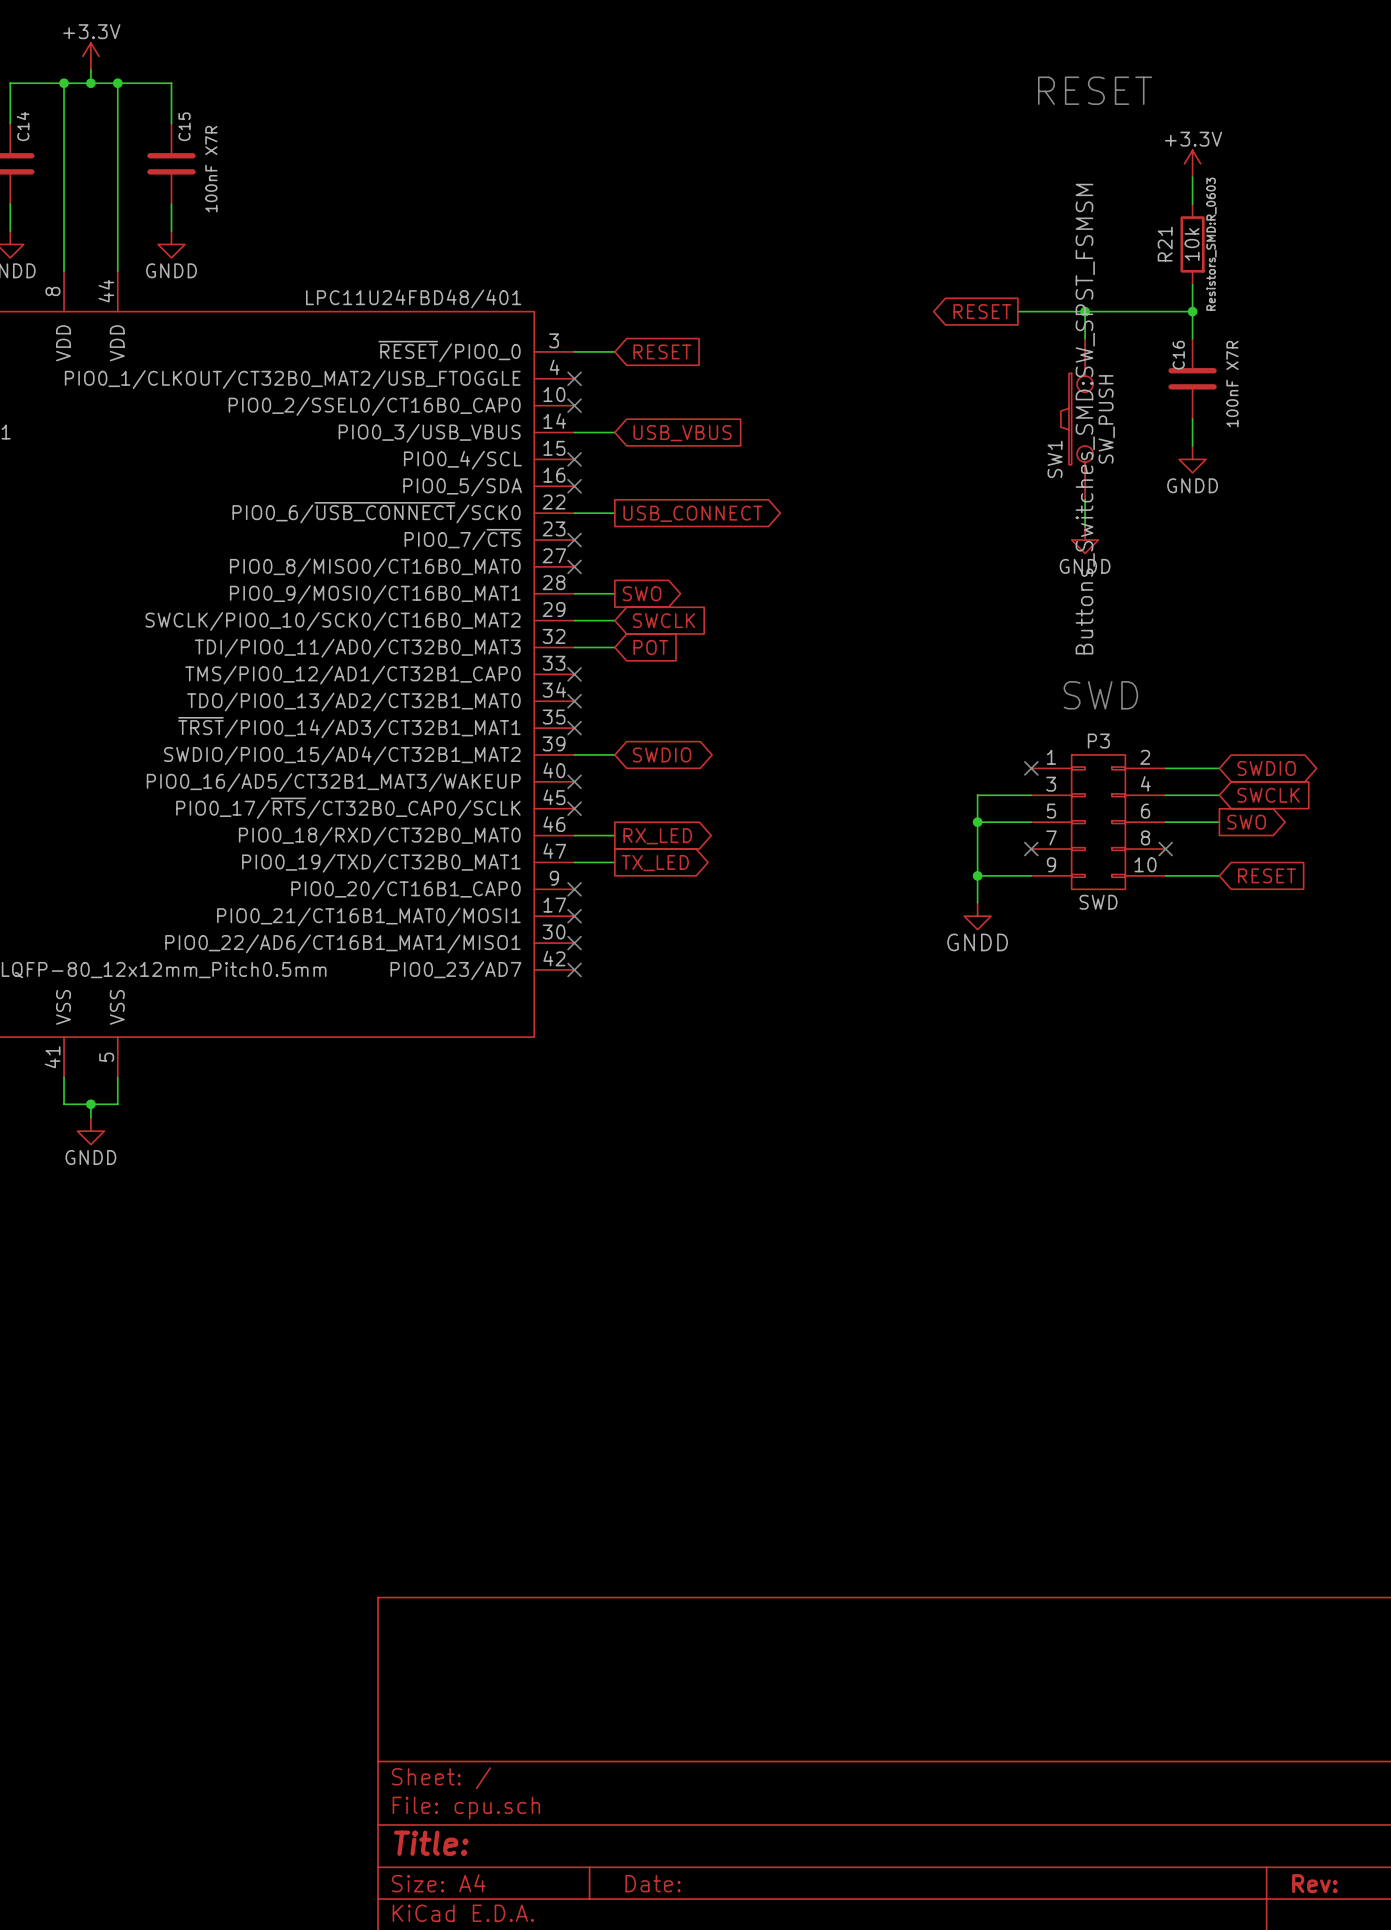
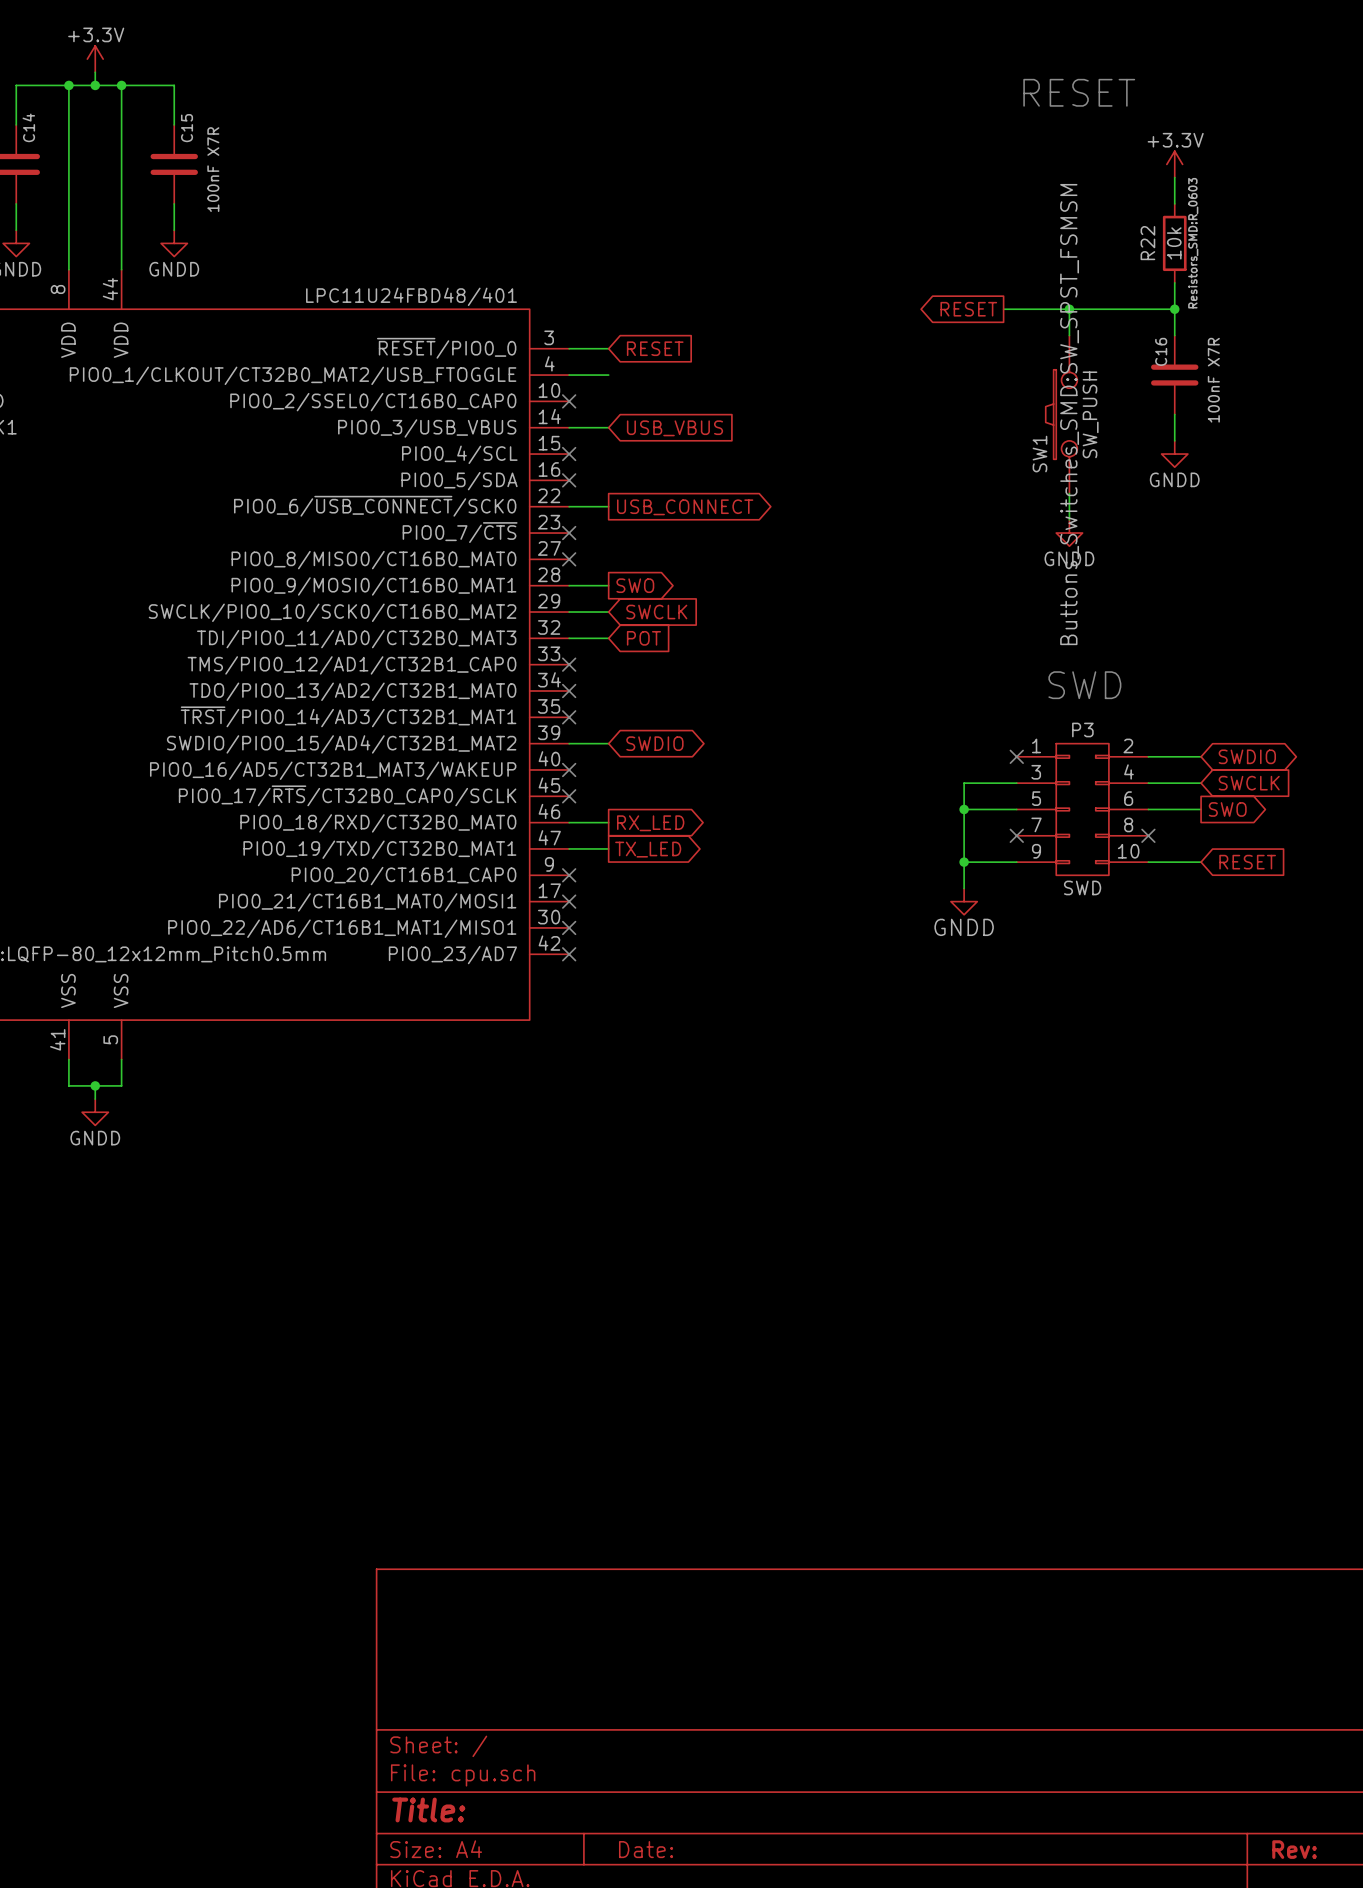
R21 name: R21 (1165, 244) -> R22 (1147, 243)
wire: none -> (569, 375) (608, 375)
no-connect mark: (574, 378) -> none

